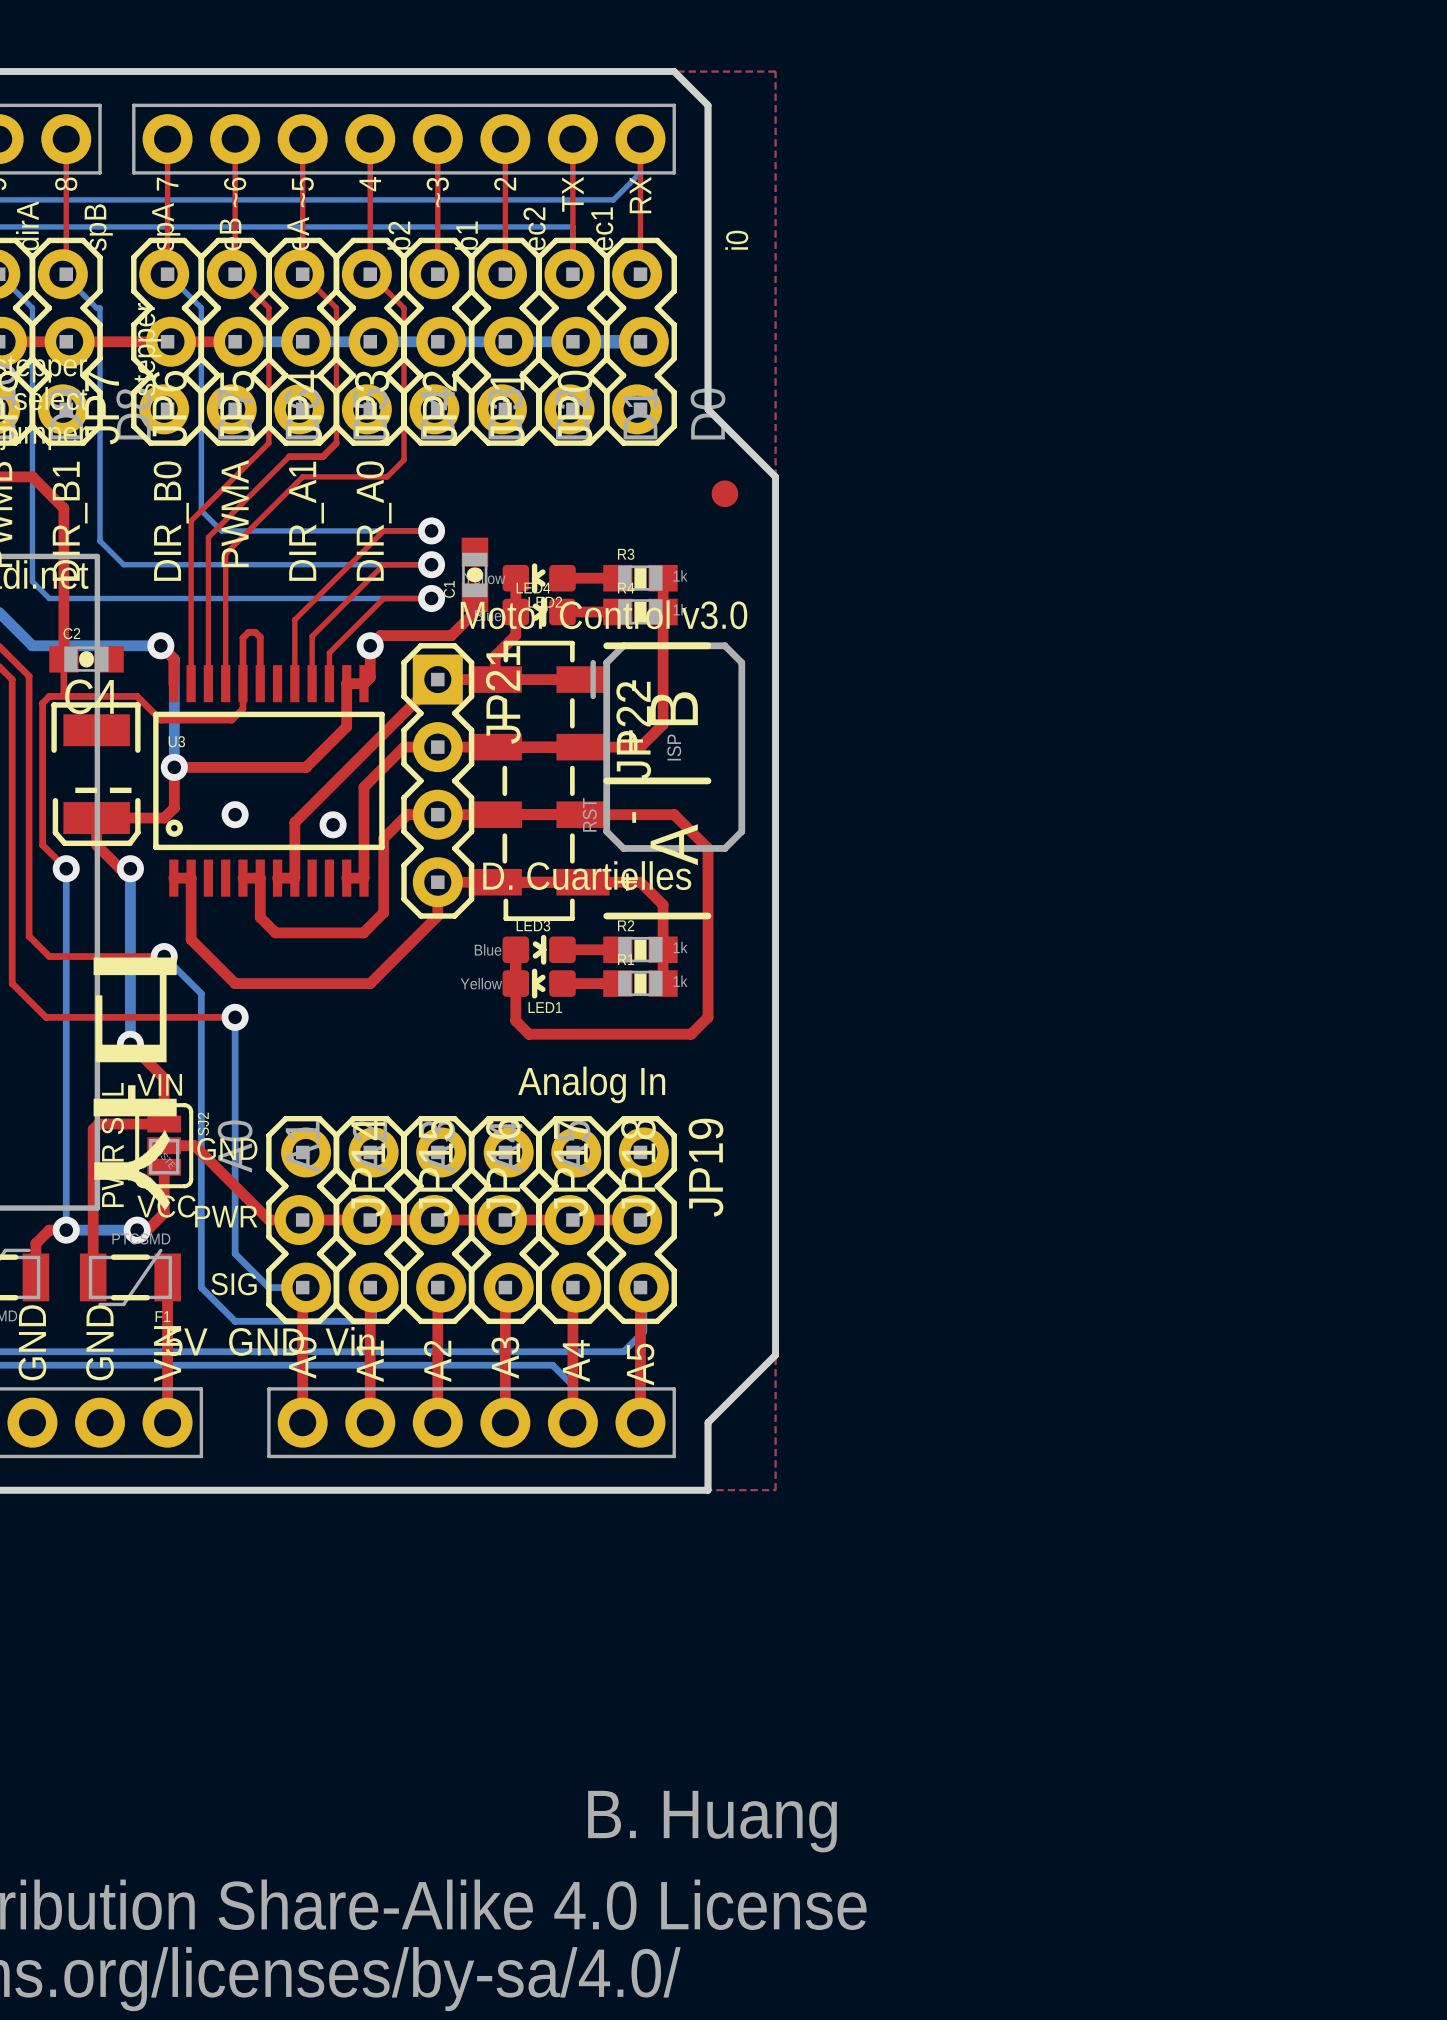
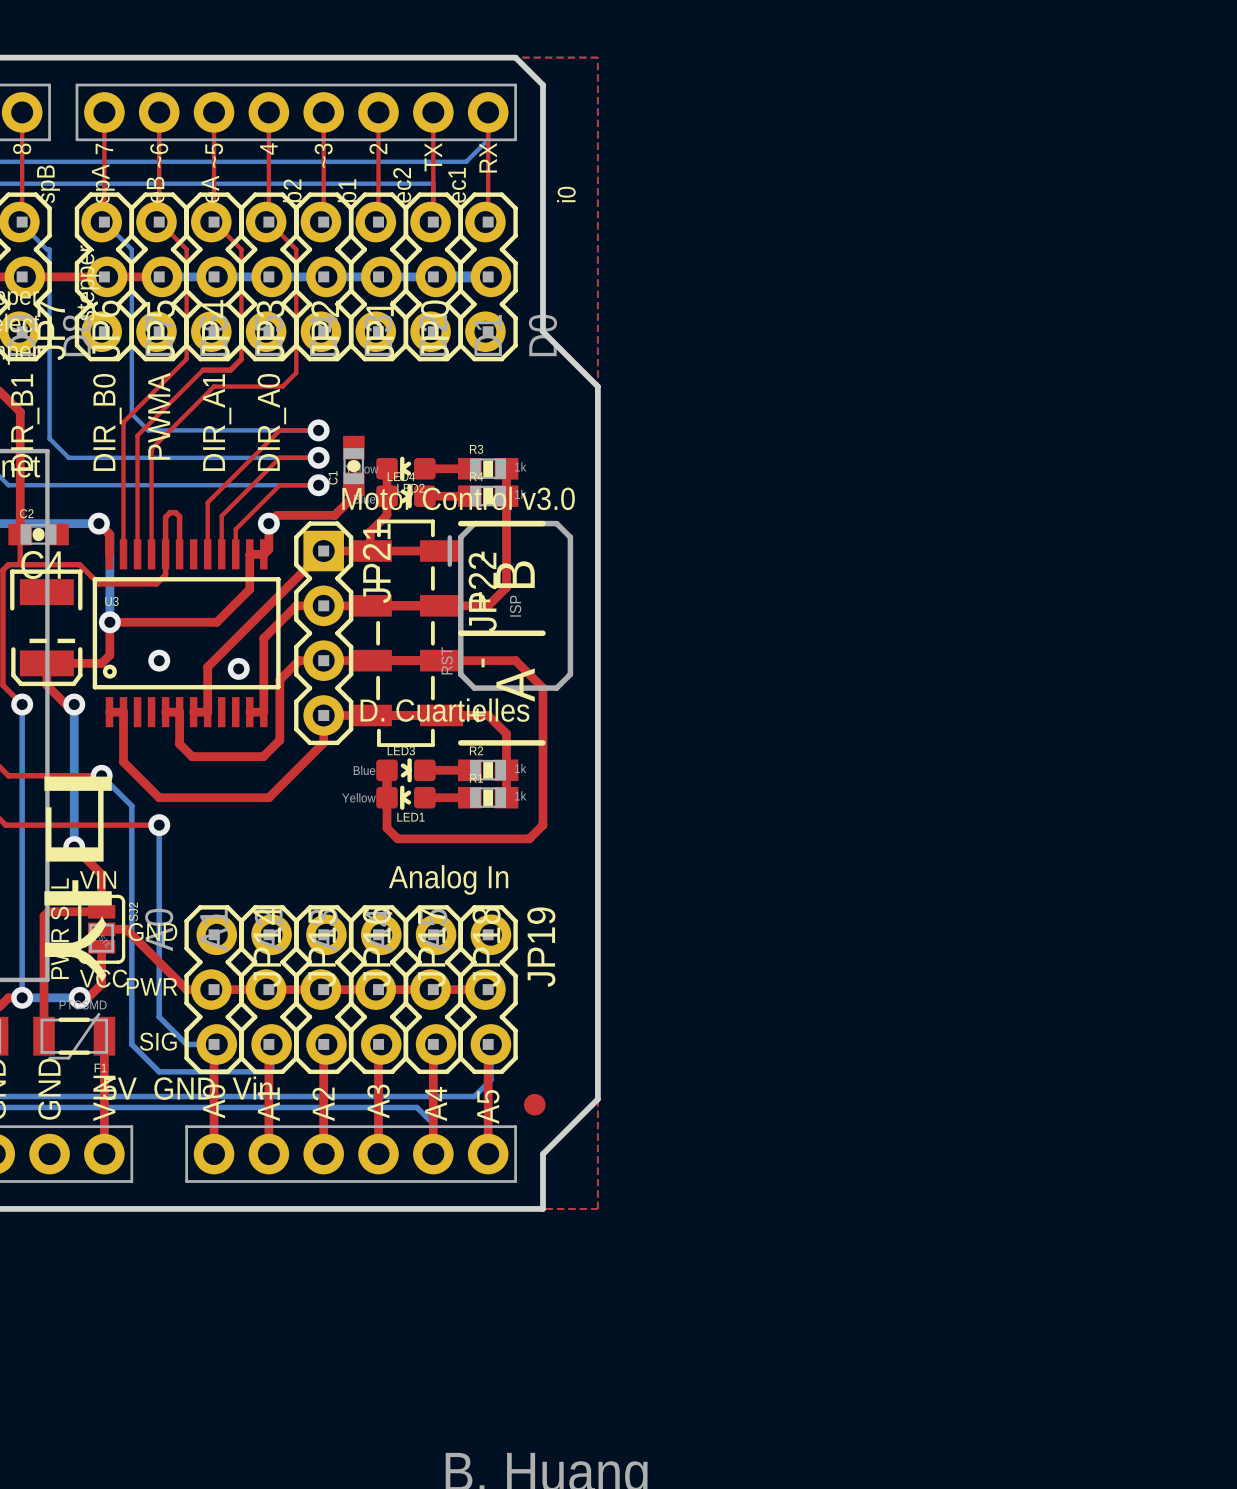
part: (724, 493) -> none
part: none -> (534, 1104)

